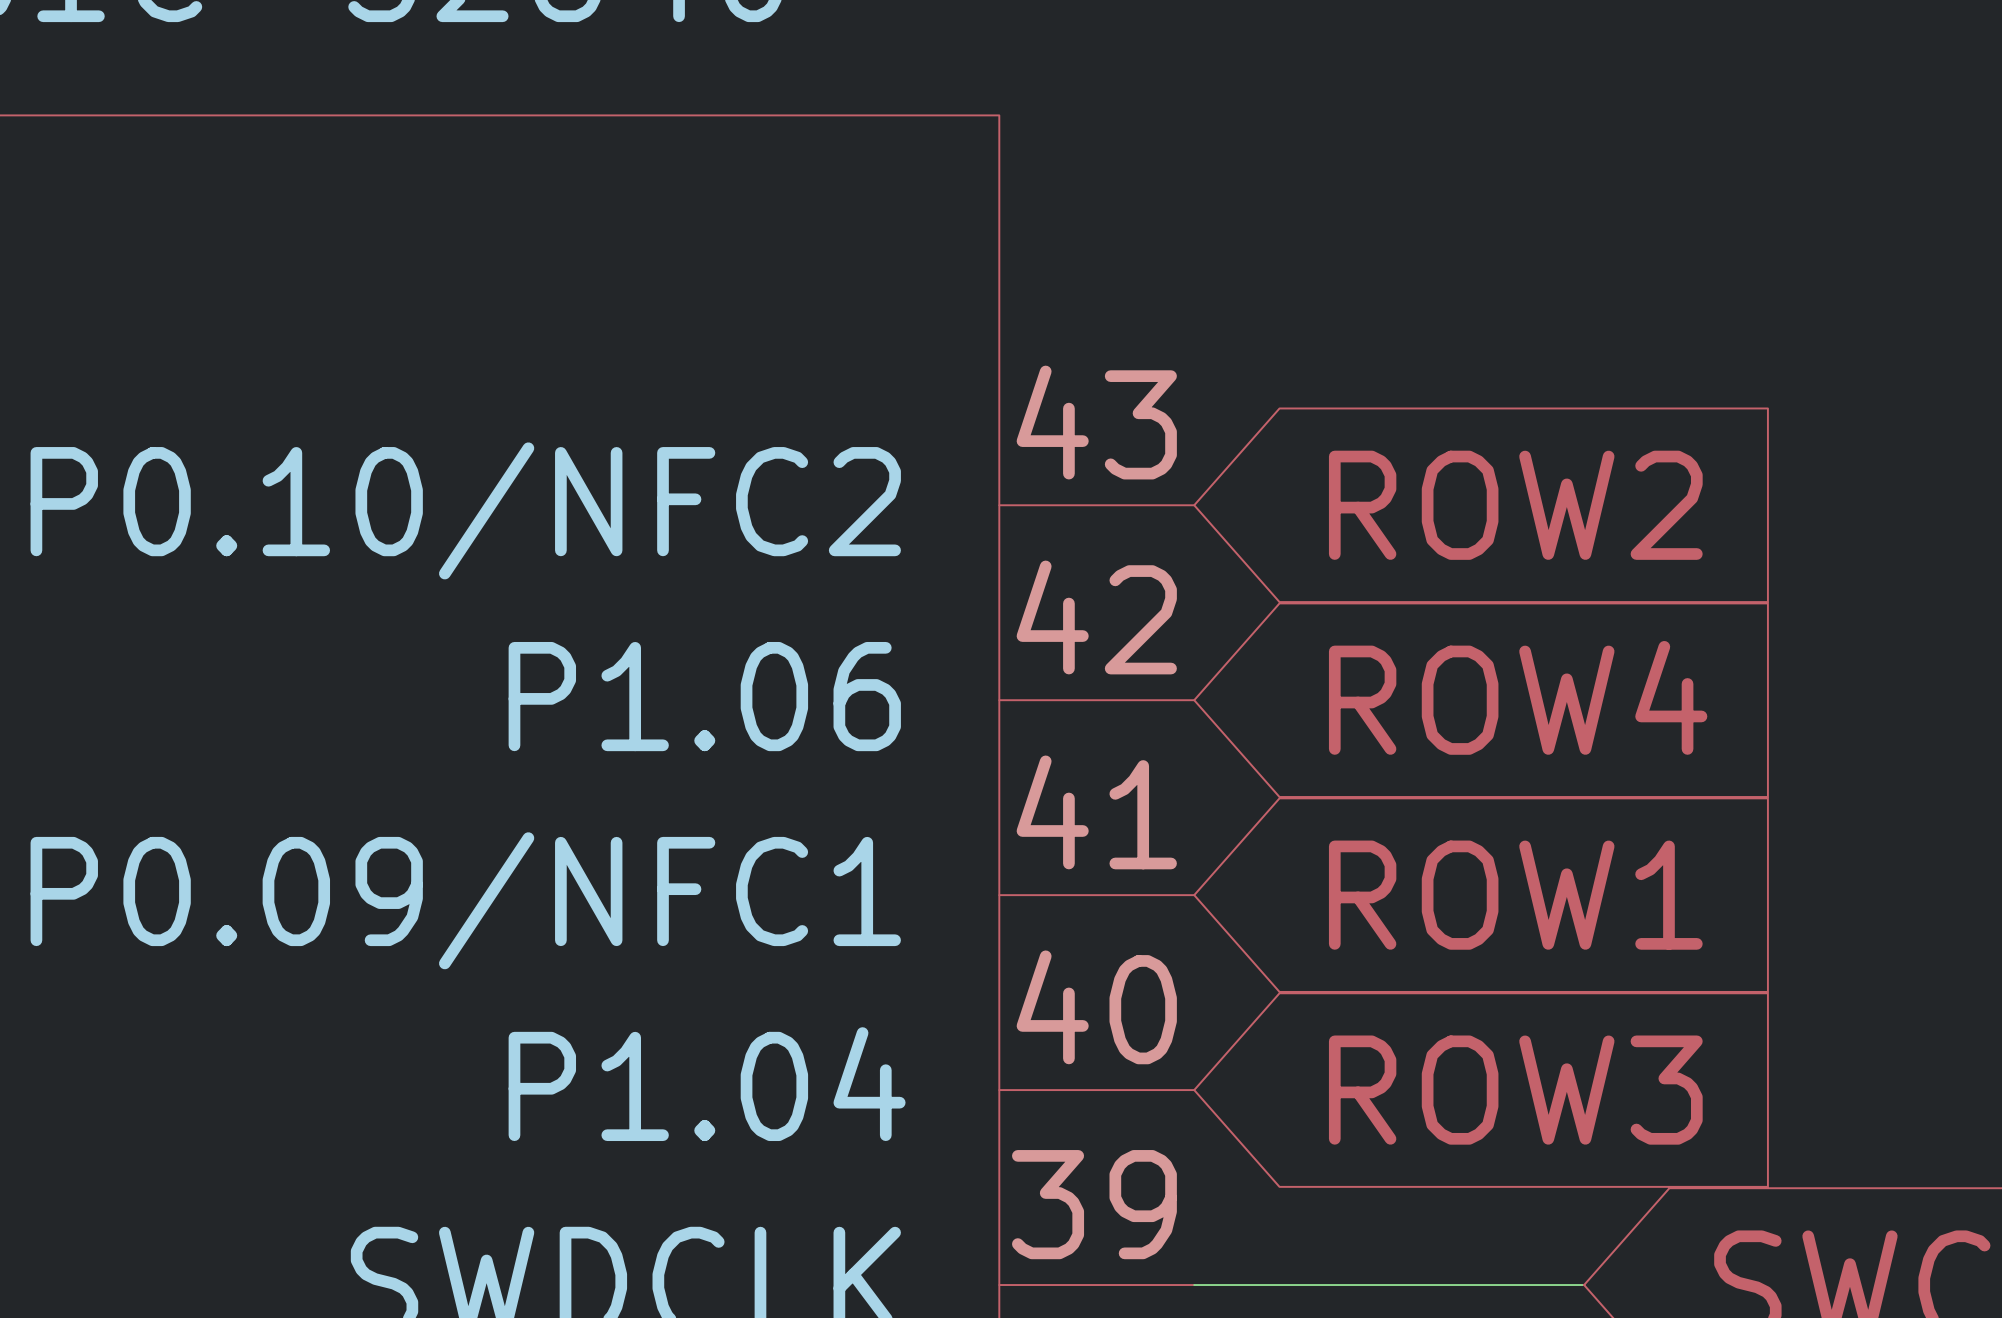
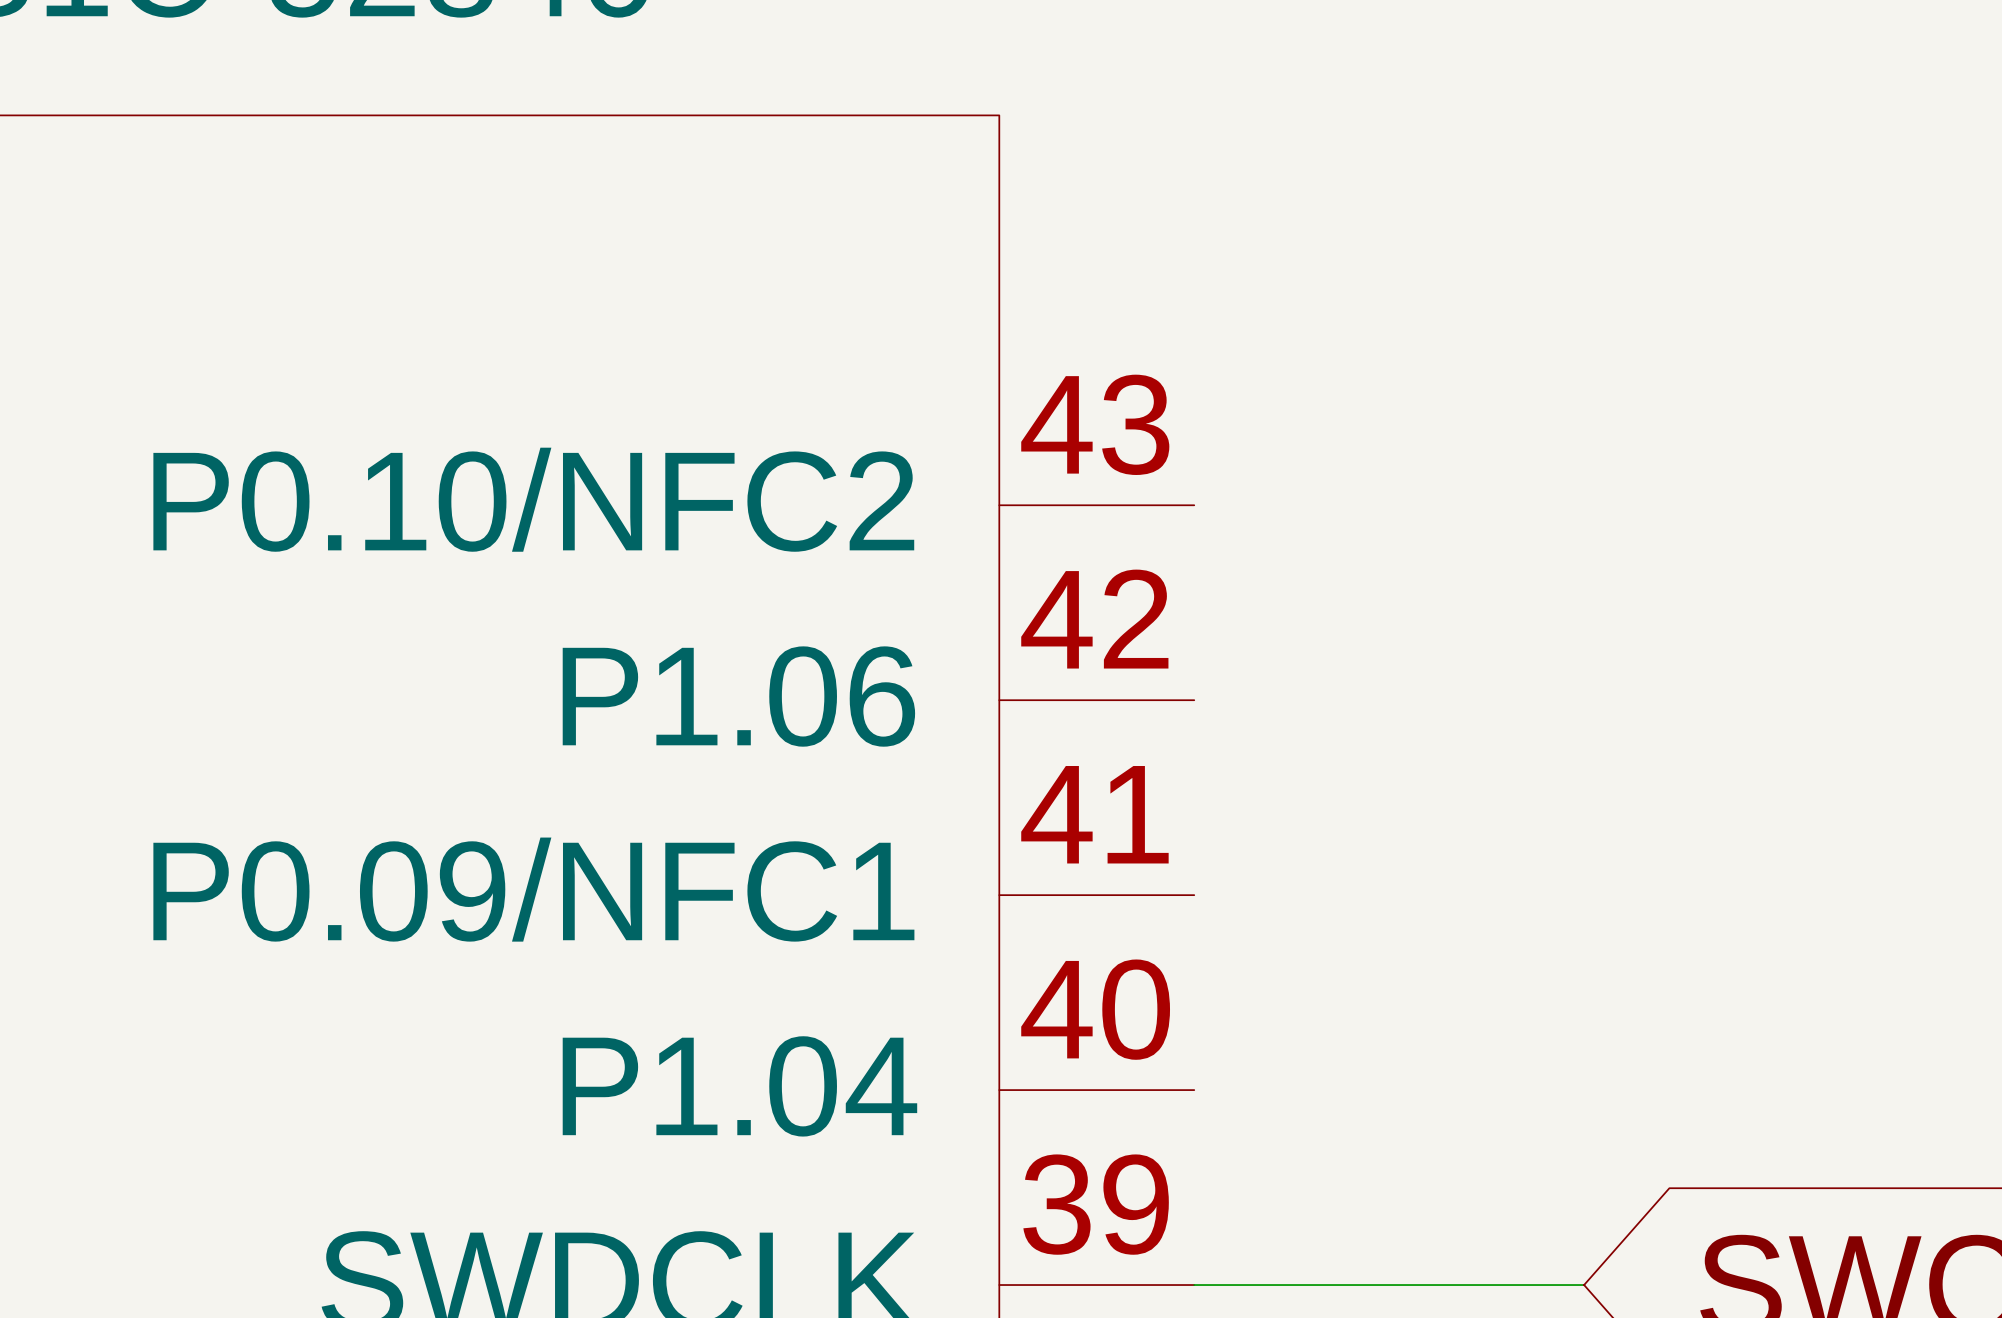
global label: ROW2 (1515, 505) -> none
global label: ROW4 (1518, 697) -> none
global label: ROW1 (1515, 895) -> none
global label: ROW3 (1515, 1090) -> none

